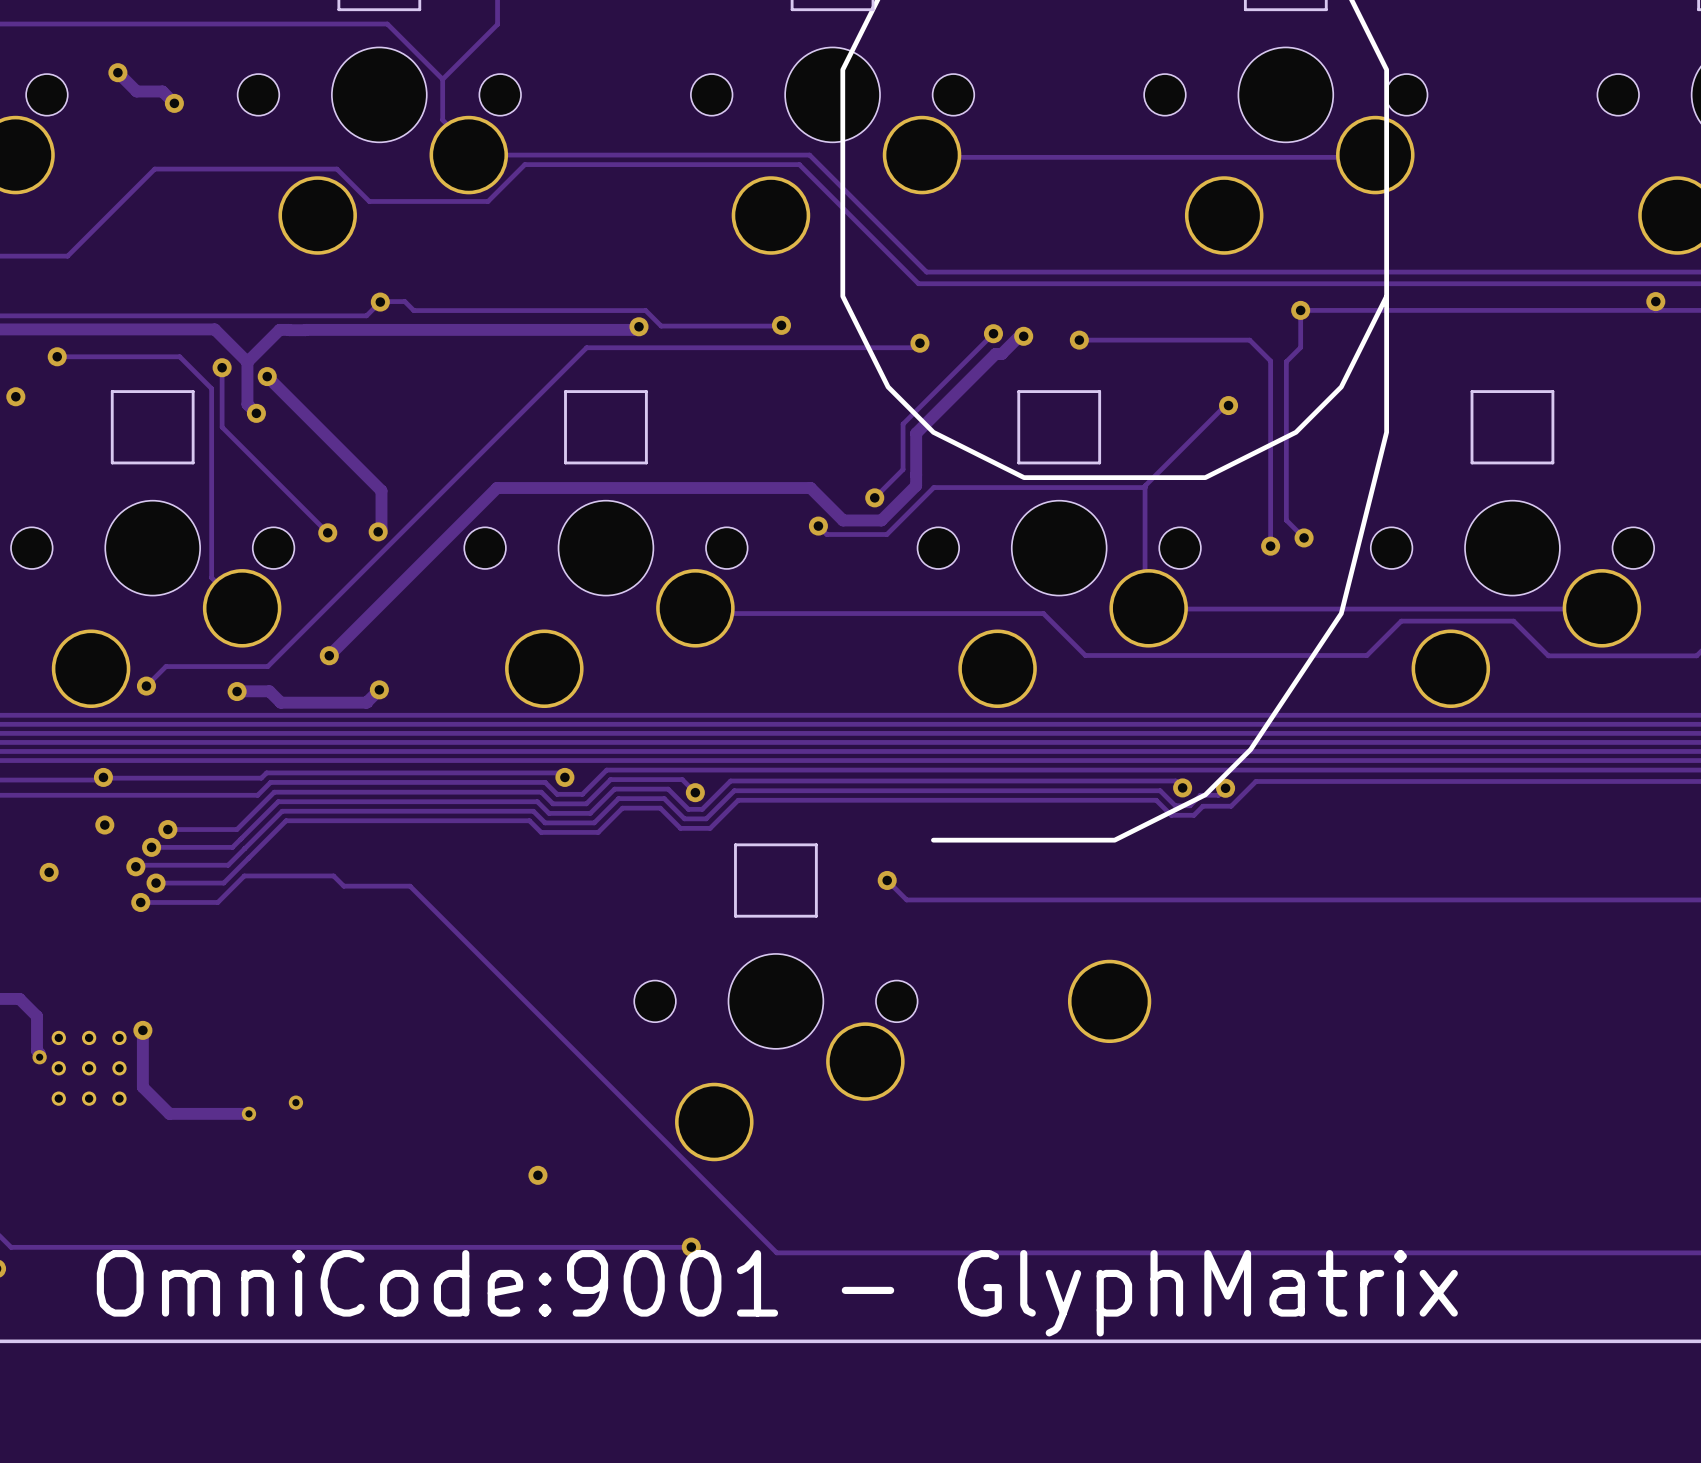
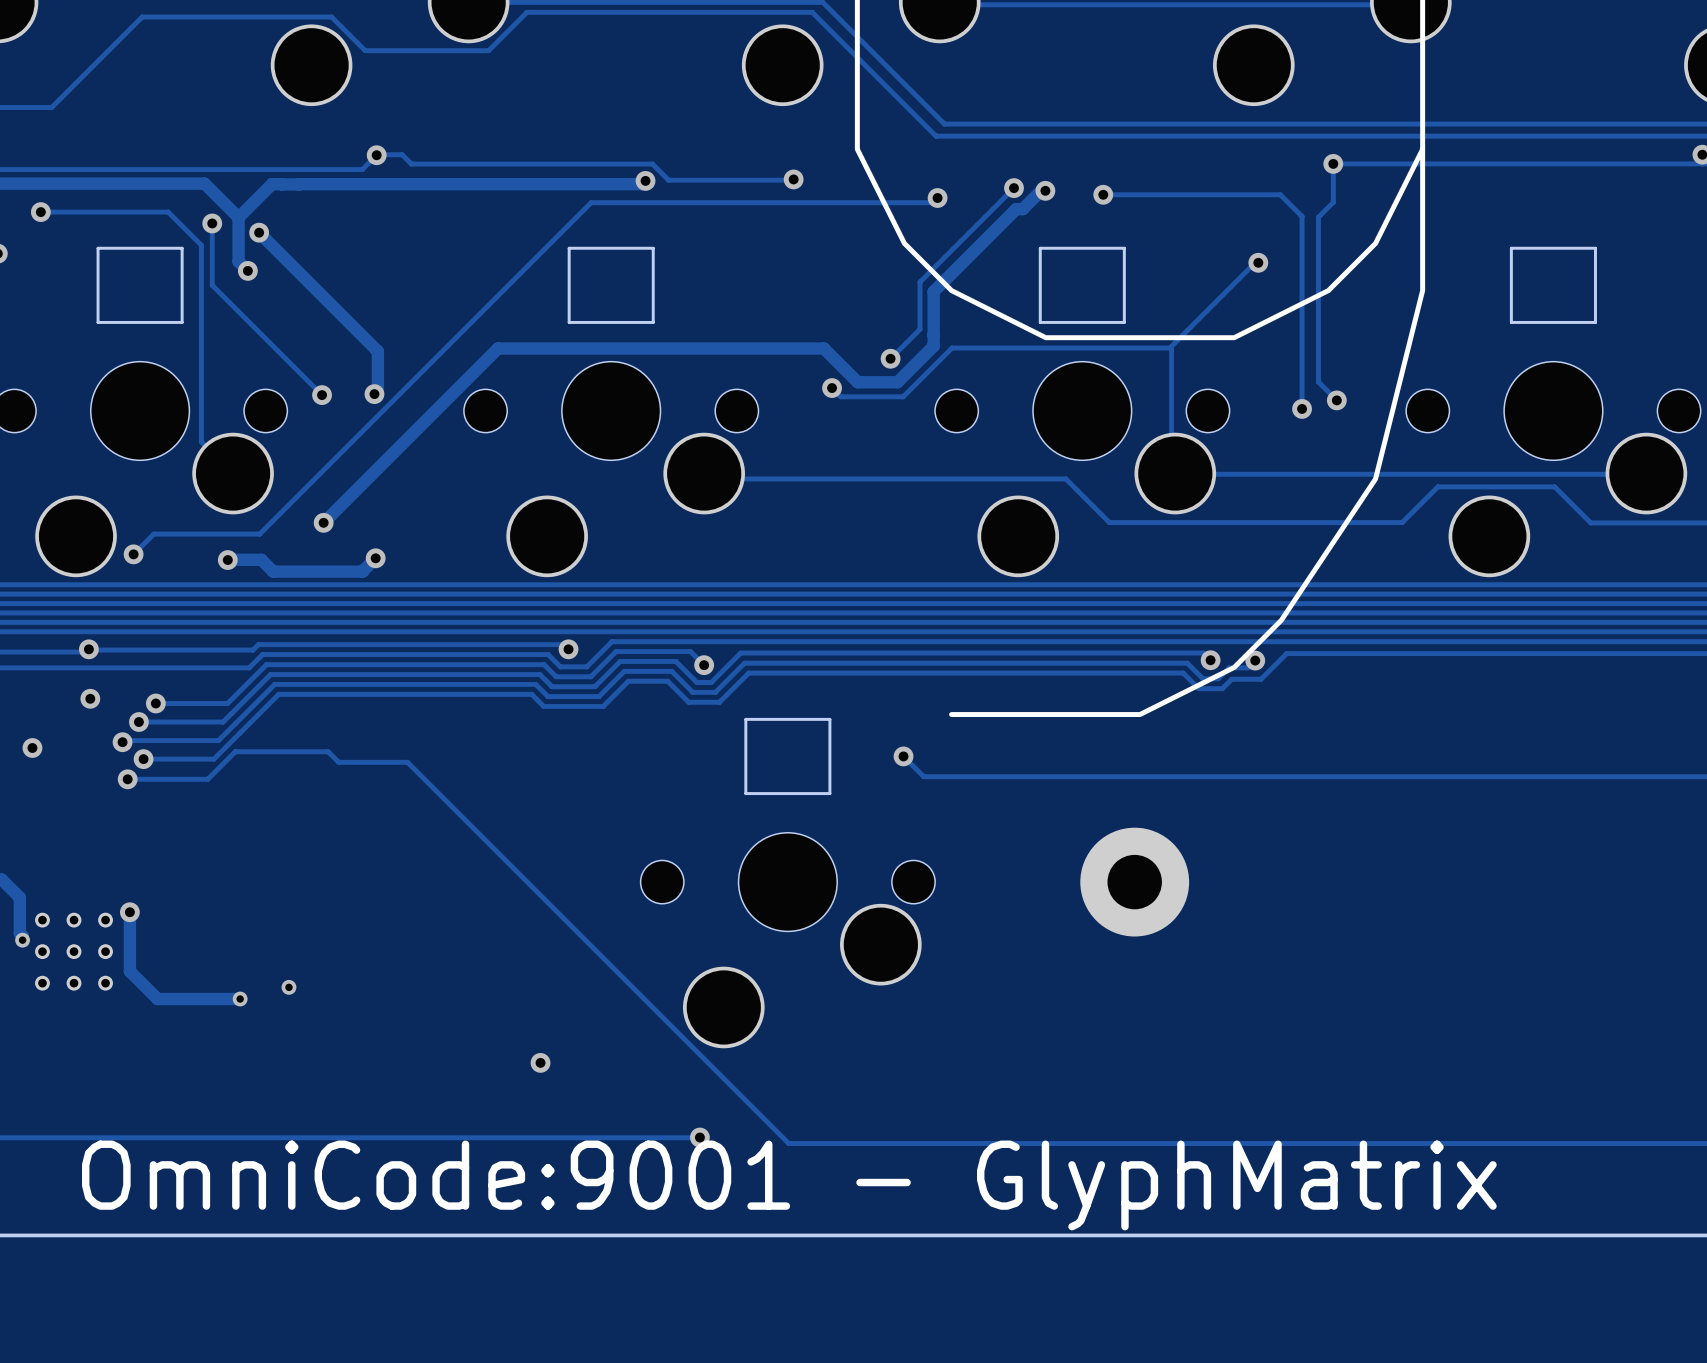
part footprint: [1067, 959, 1152, 1044] -> [1080, 827, 1190, 937]

